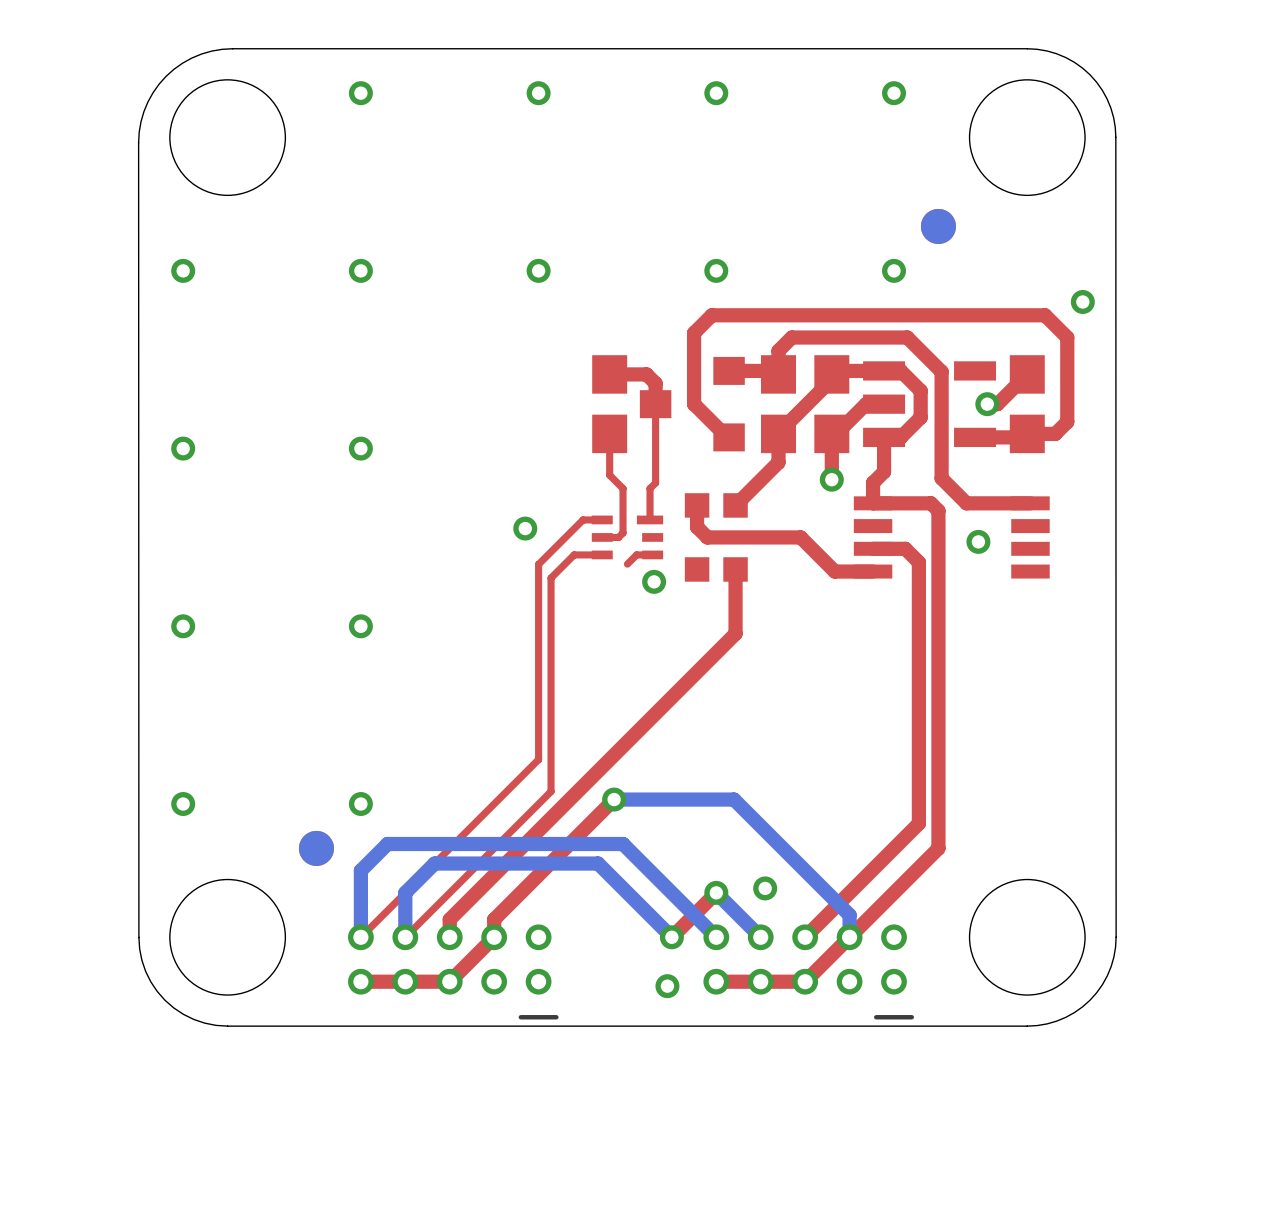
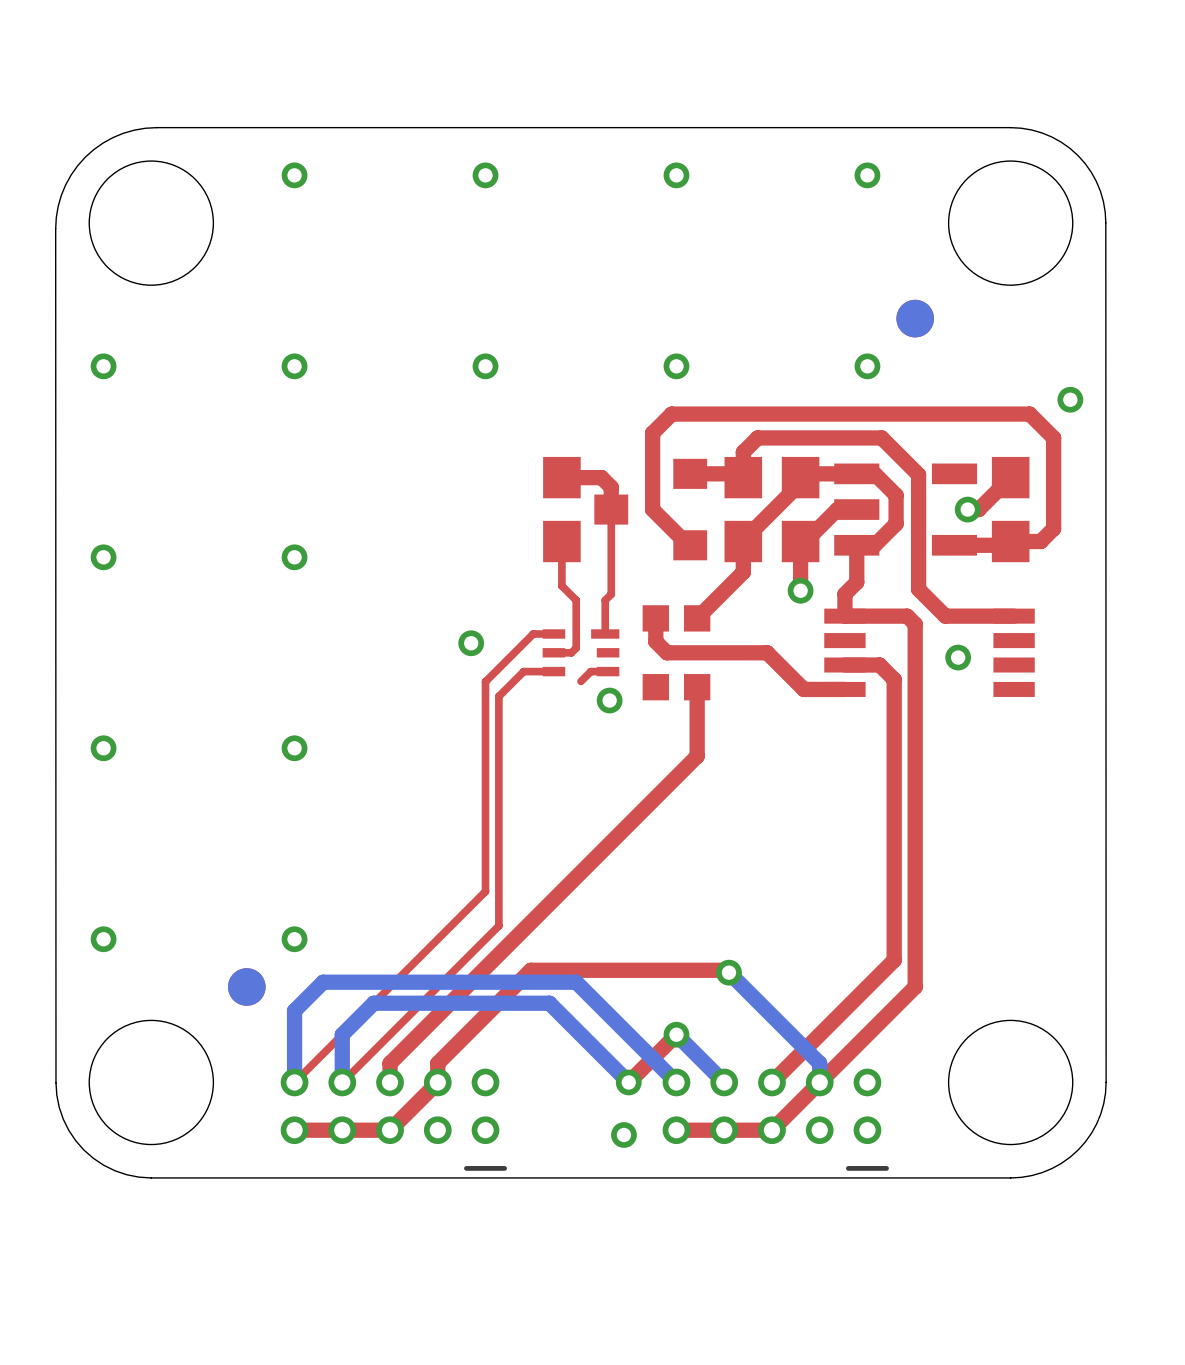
top track: (614, 799) (580, 832) -> (729, 972) (726, 970) (530, 970)
bottom track: (614, 799) (734, 799) (849, 915) (849, 919) -> (729, 972) (819, 1063)
via: (614, 799) -> none
via position: (765, 888) -> (729, 972)

